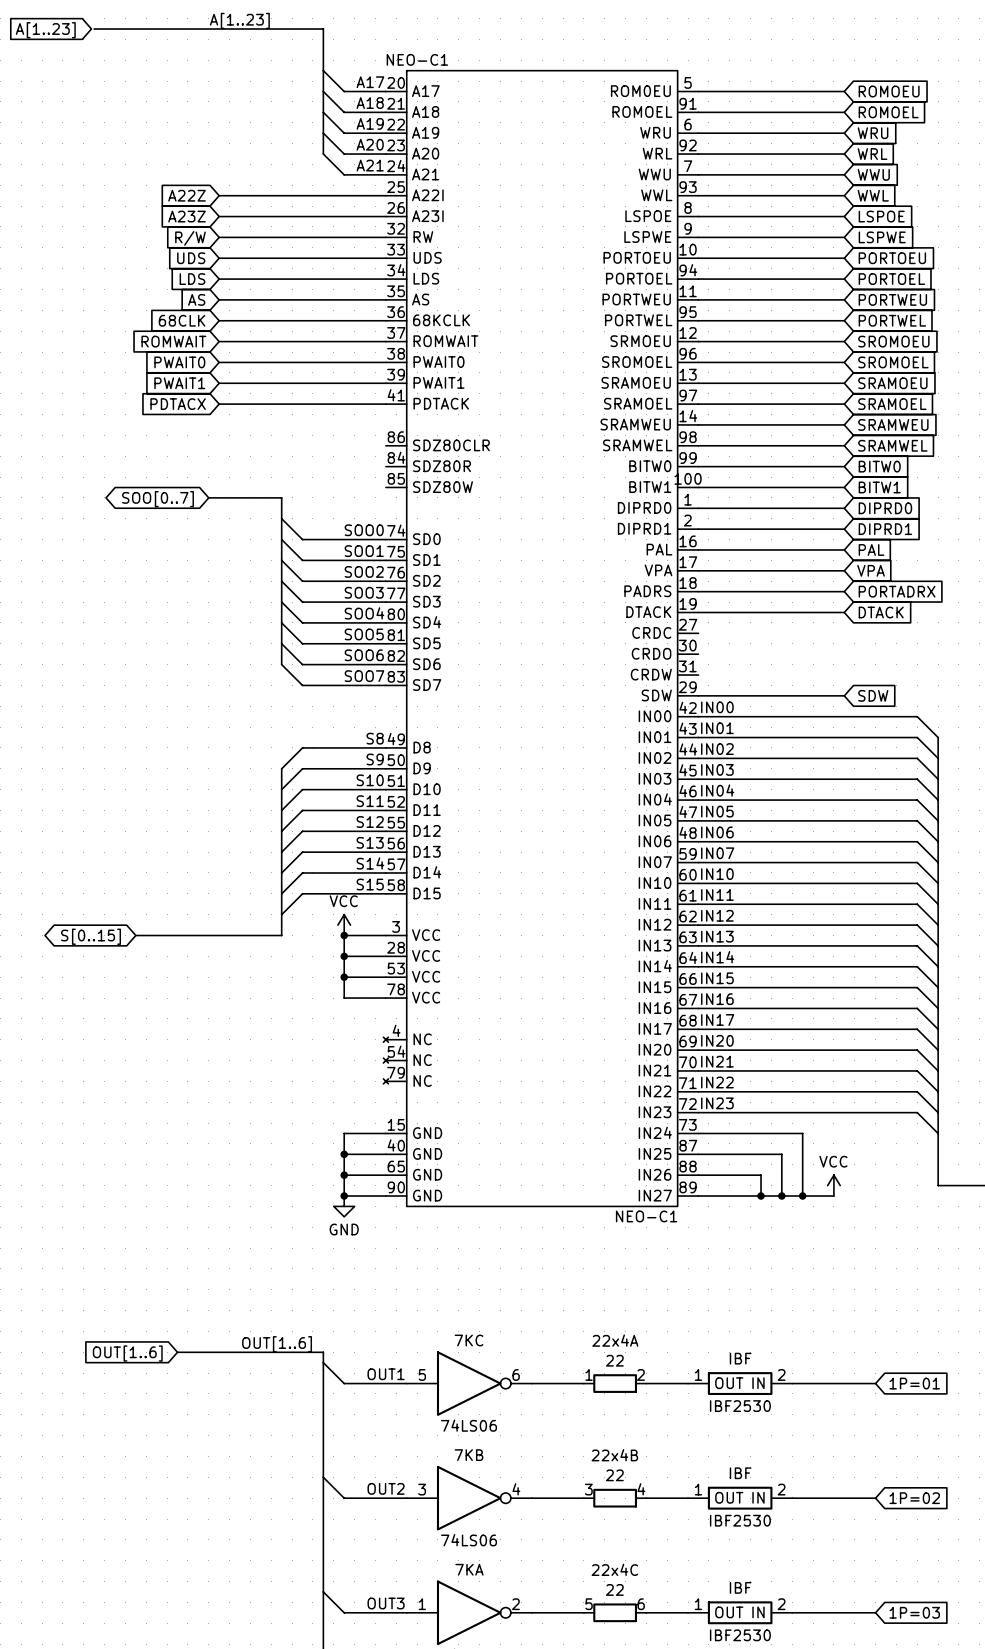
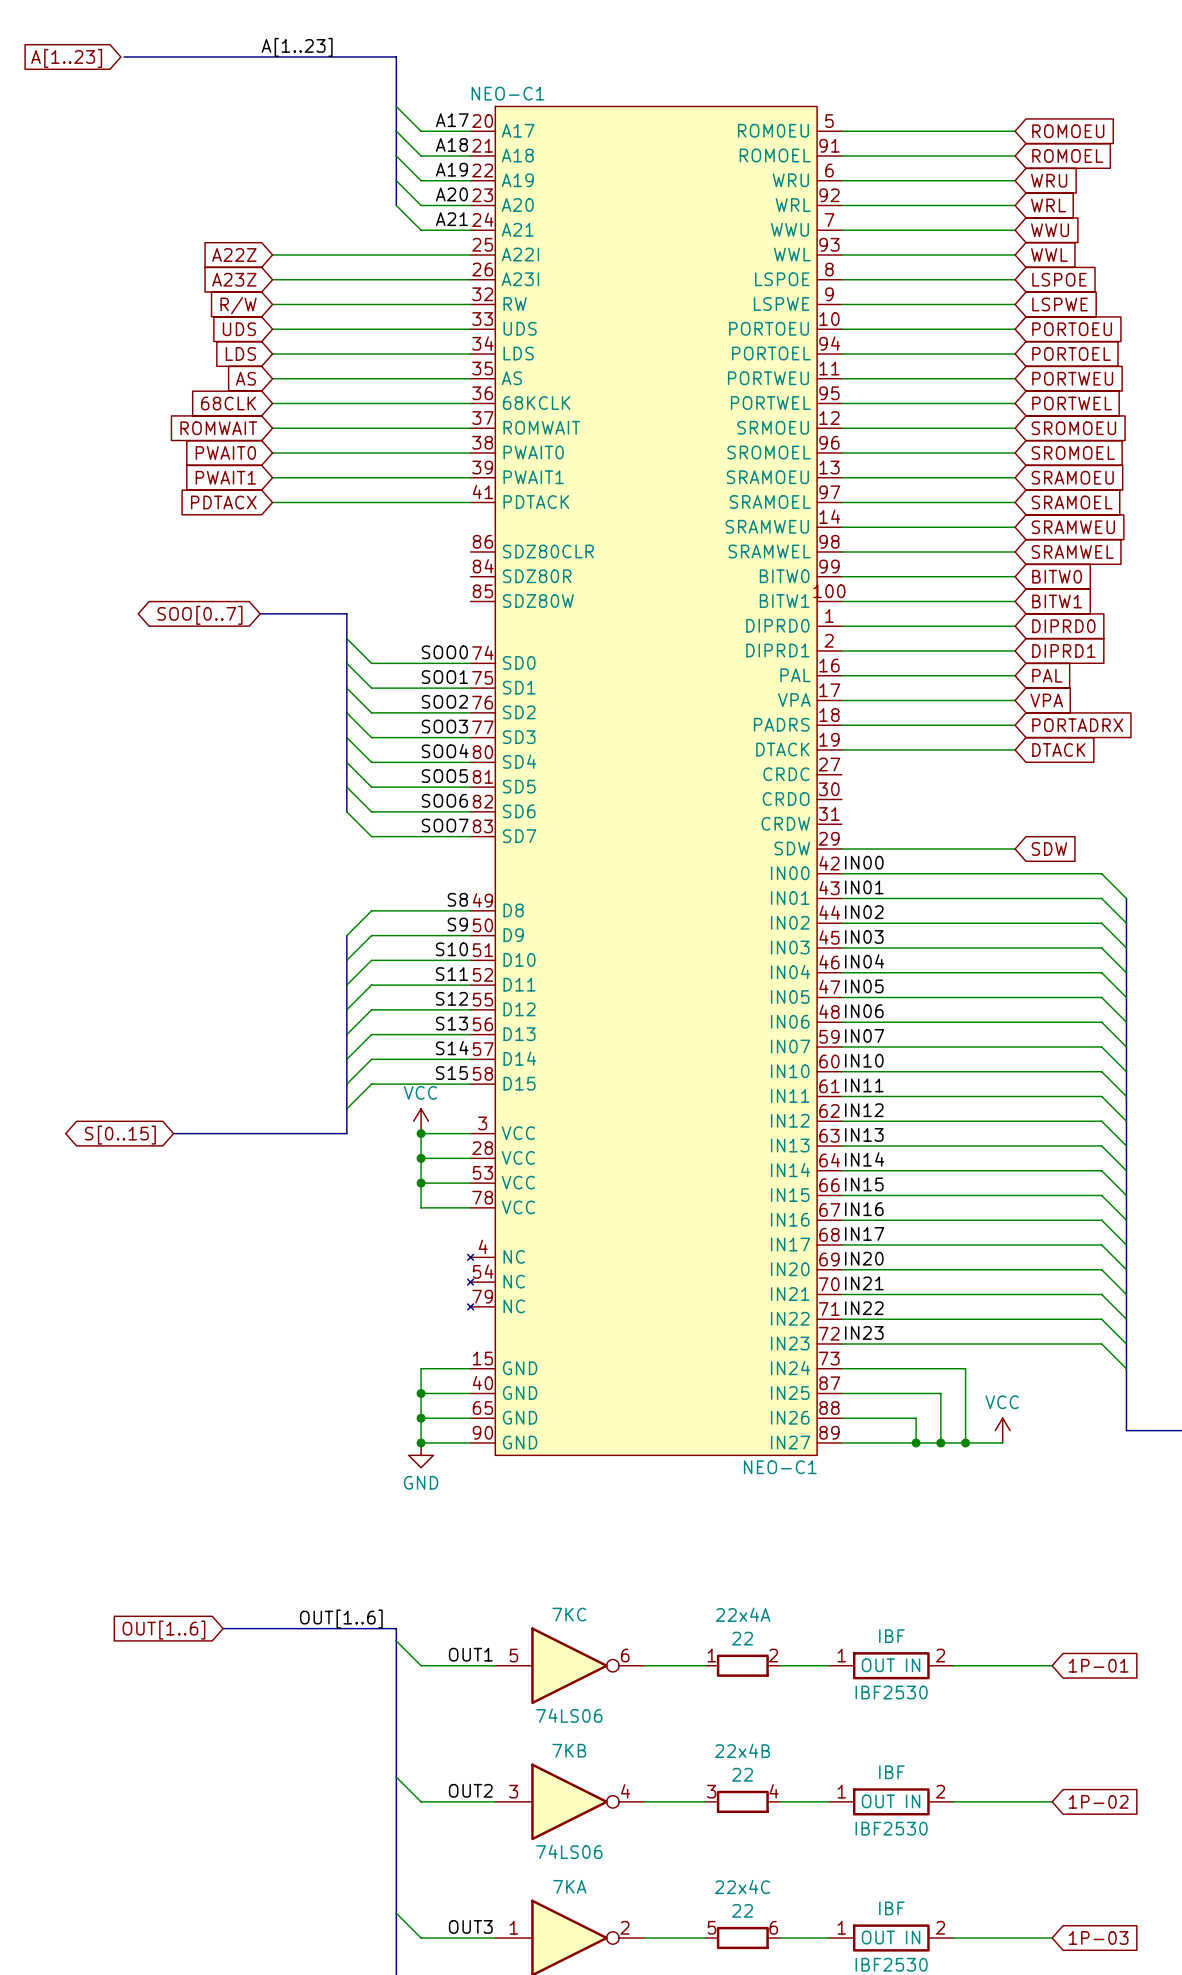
NEO-C1 symbol: [383, 70, 699, 1207] -> [467, 106, 842, 1456]
global label: 1P=01 (914, 1383) -> 1P-01 (1098, 1665)
global label: 1P=02 (914, 1498) -> 1P-02 (1098, 1801)
global label: 1P=03 (914, 1612) -> 1P-03 (1098, 1937)

